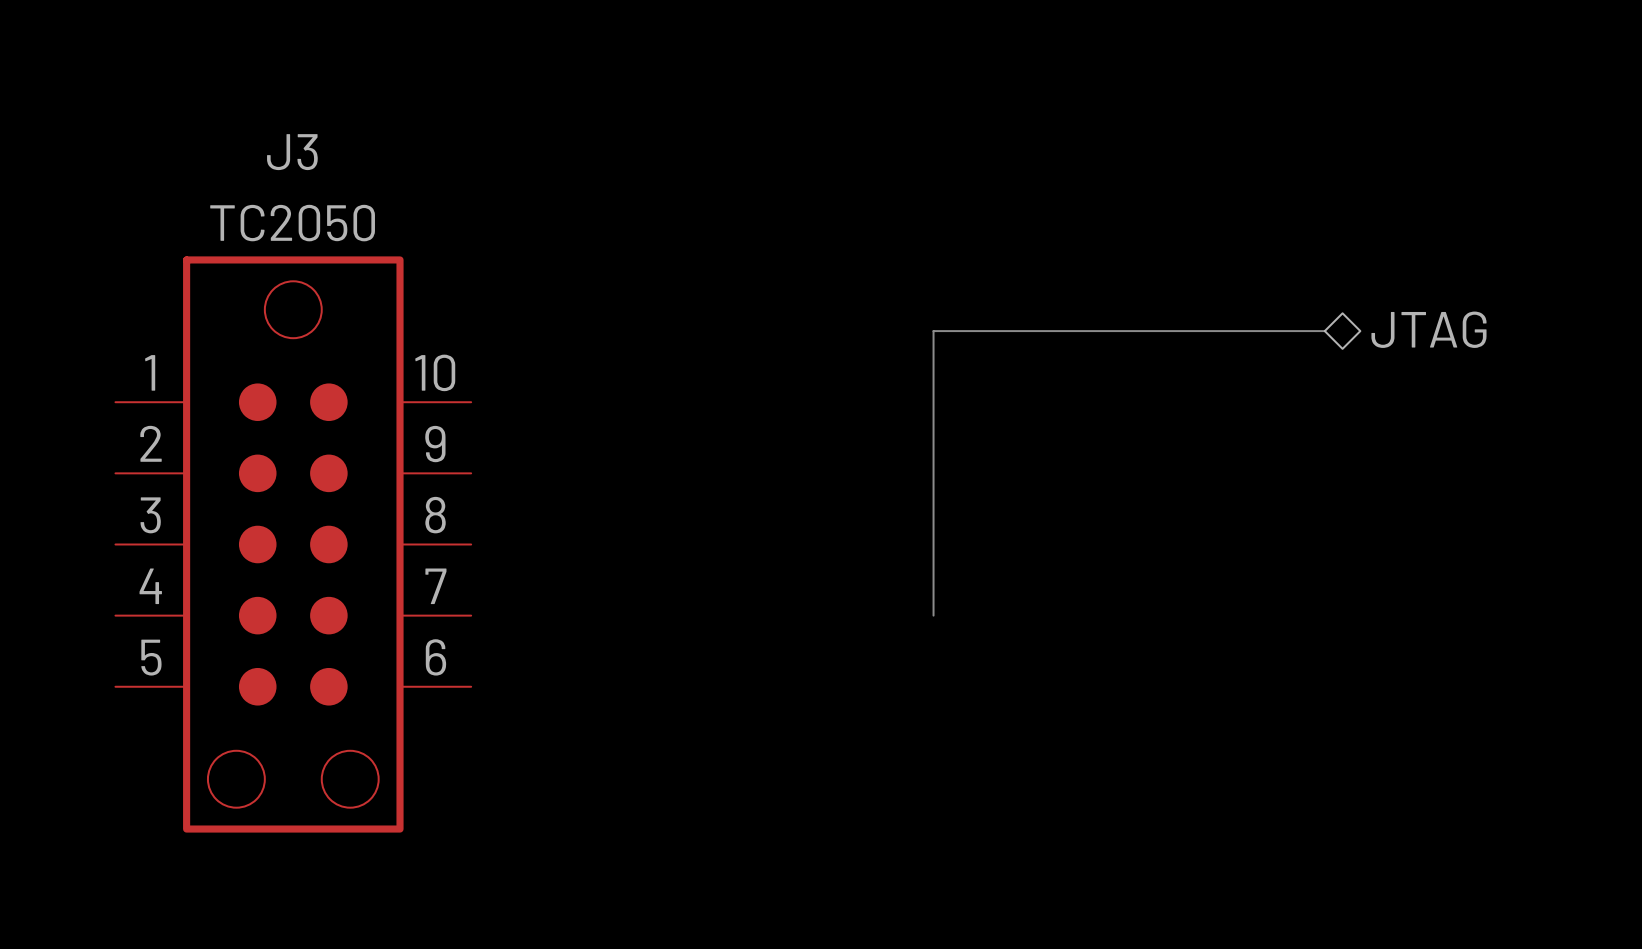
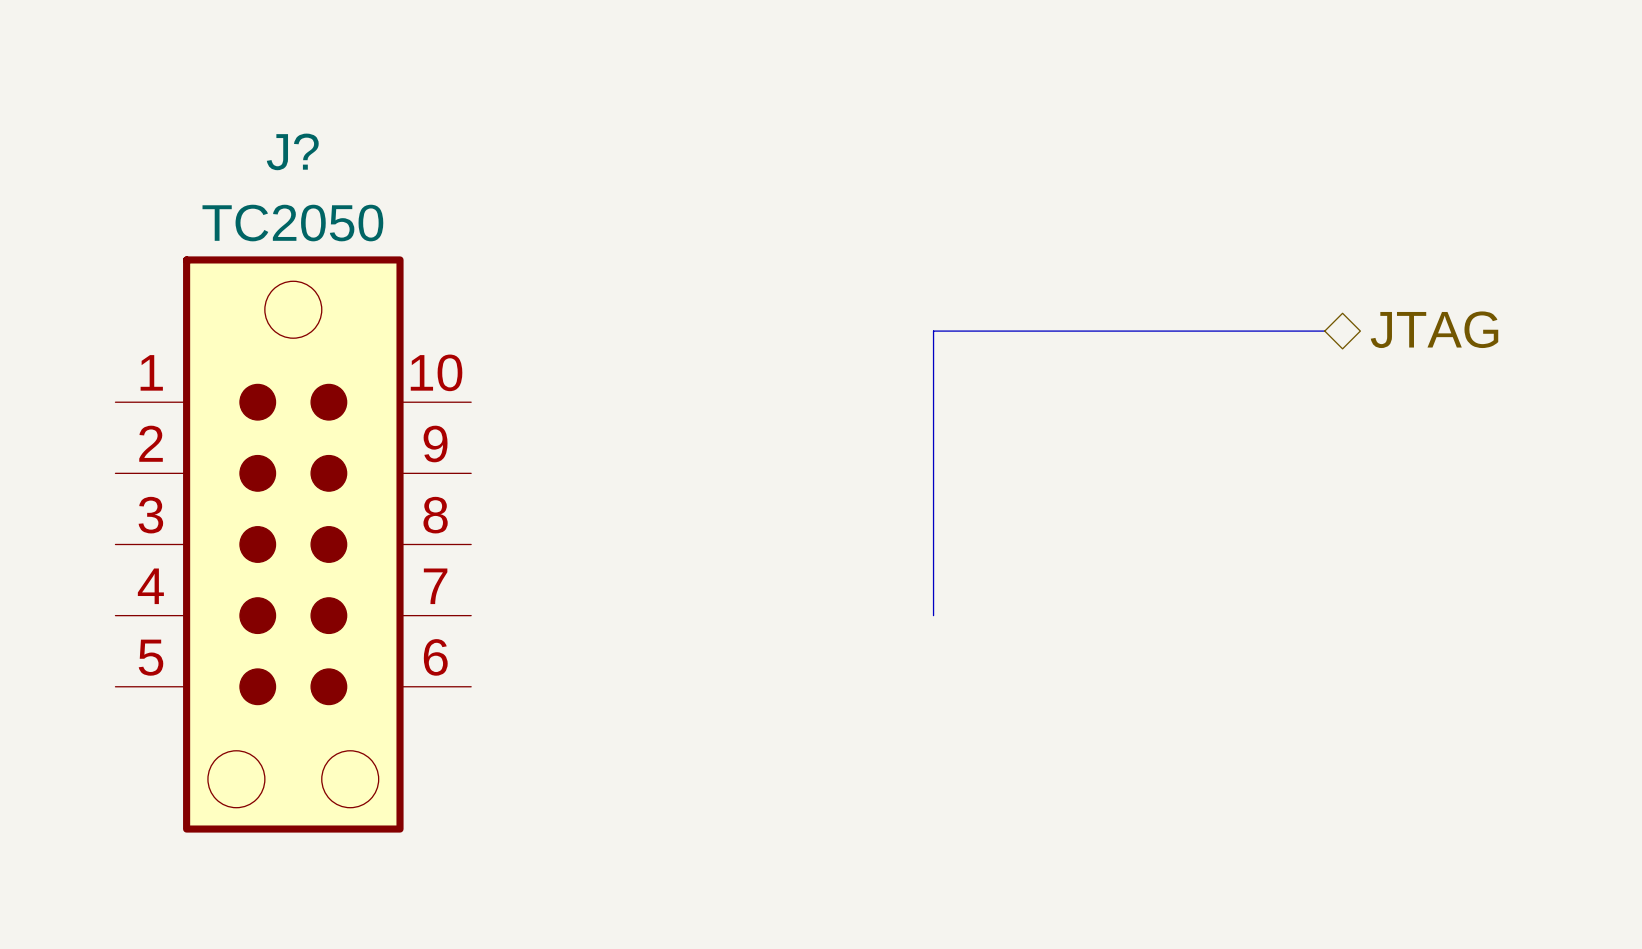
J3 name: J3 (292, 152) -> J? (292, 151)

